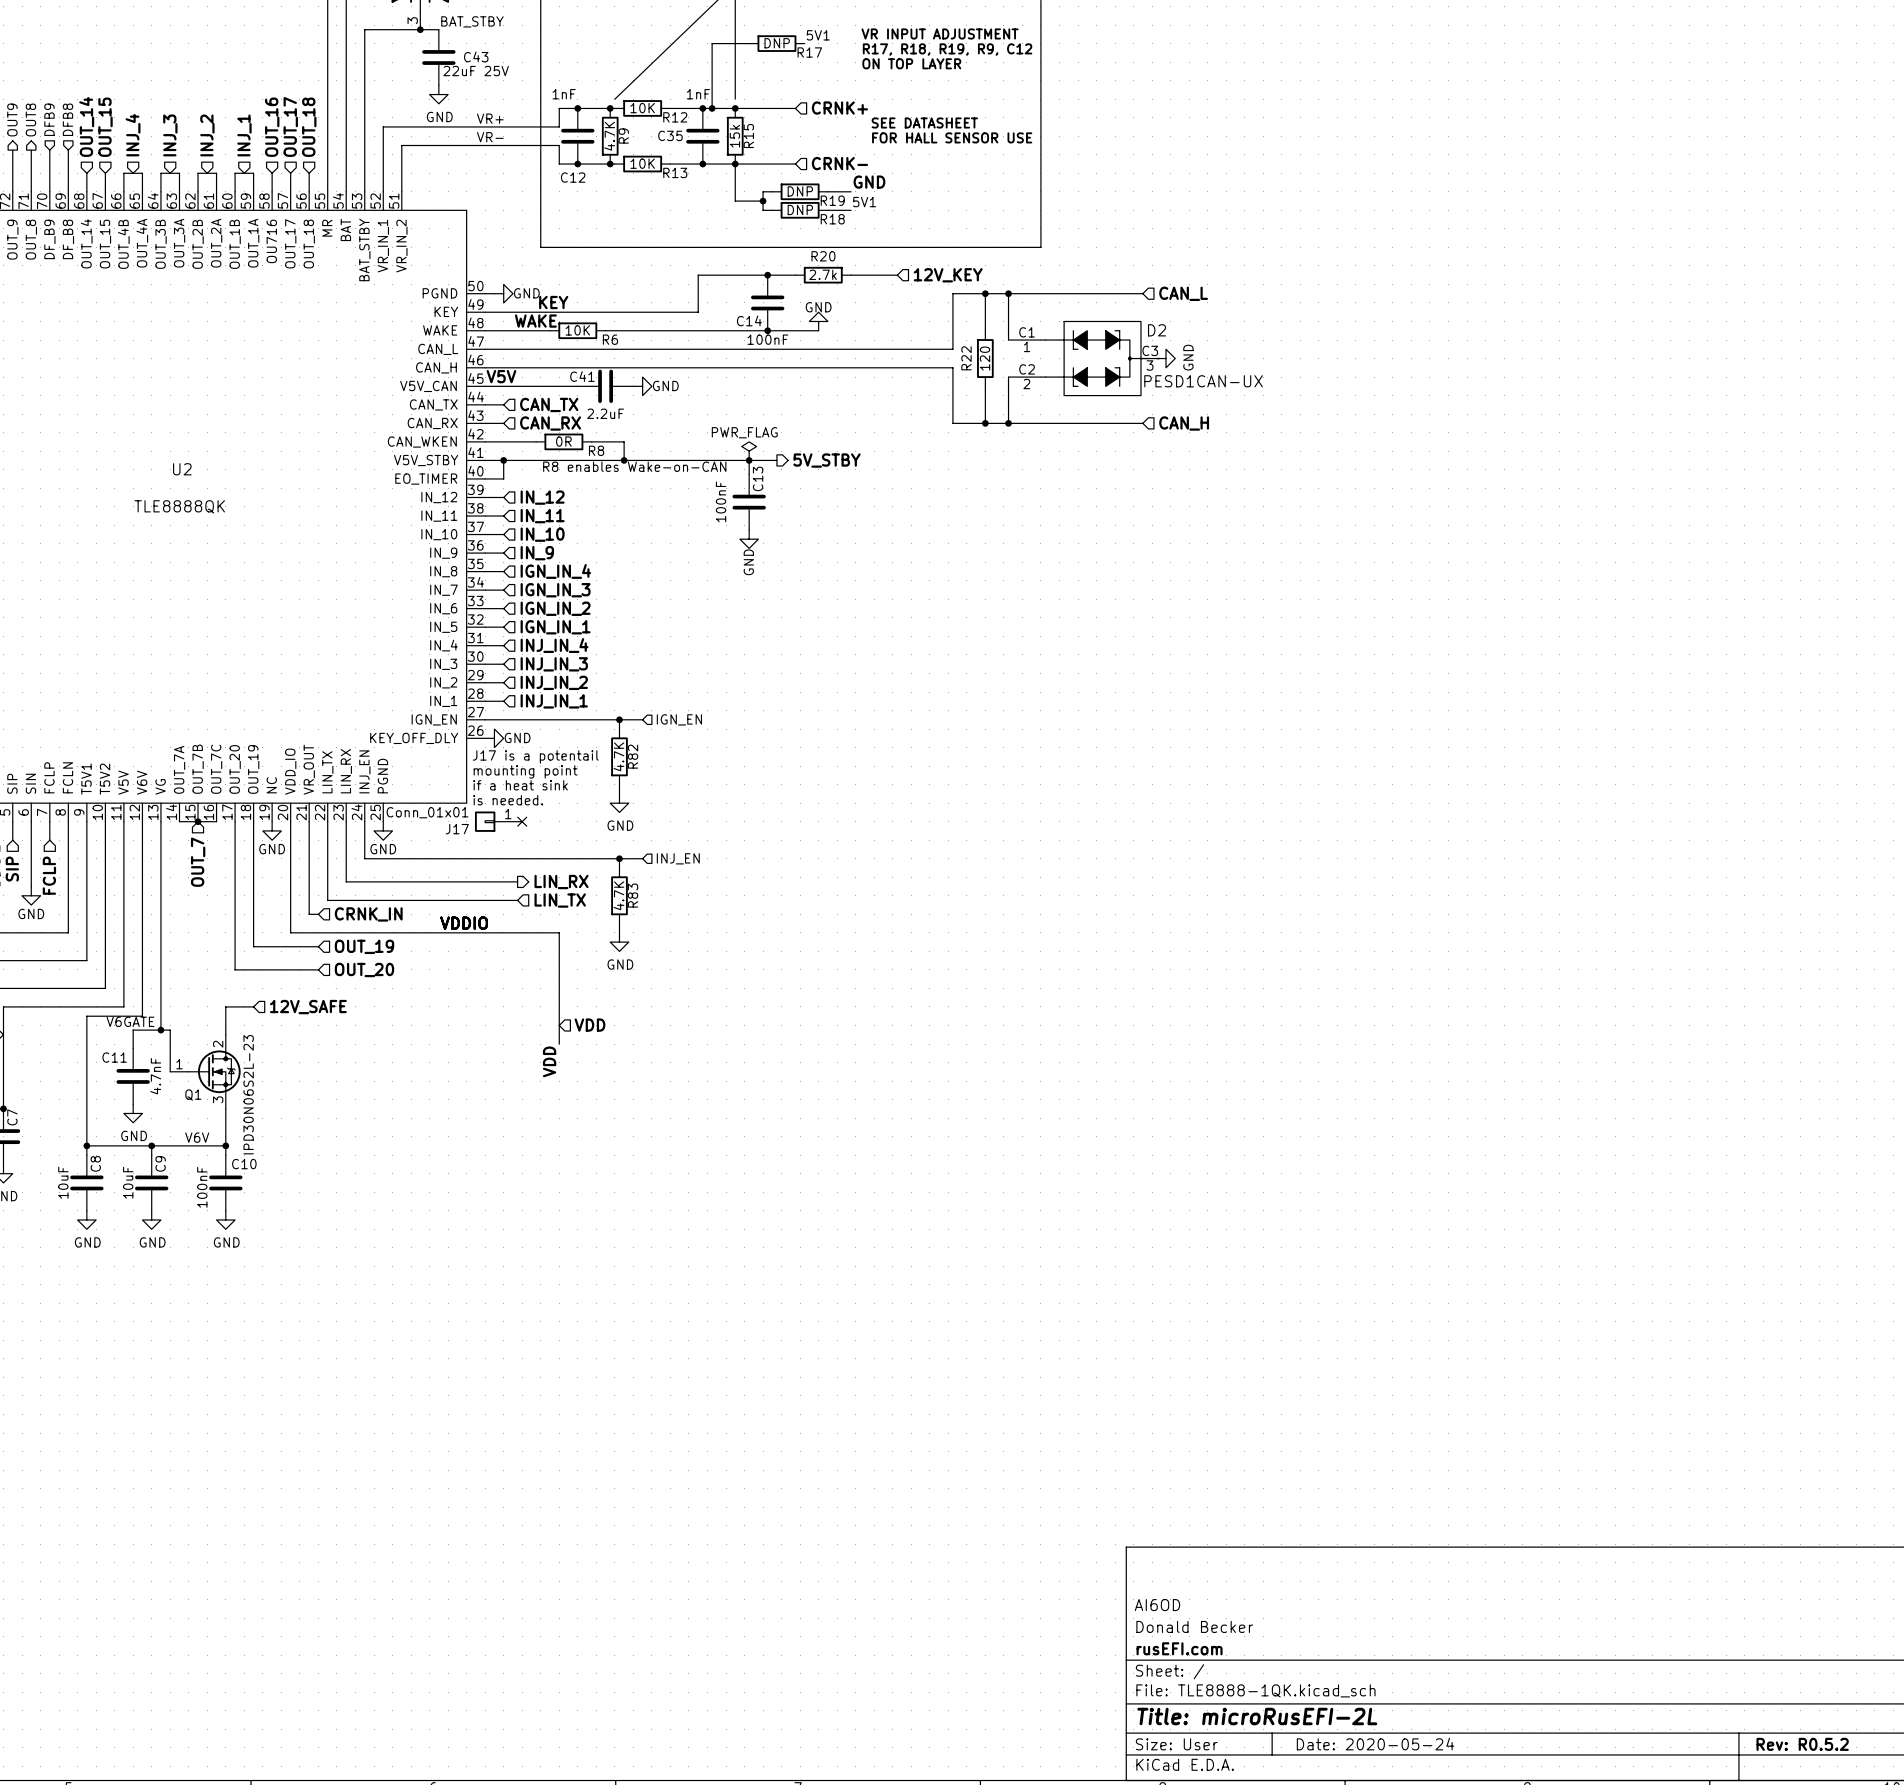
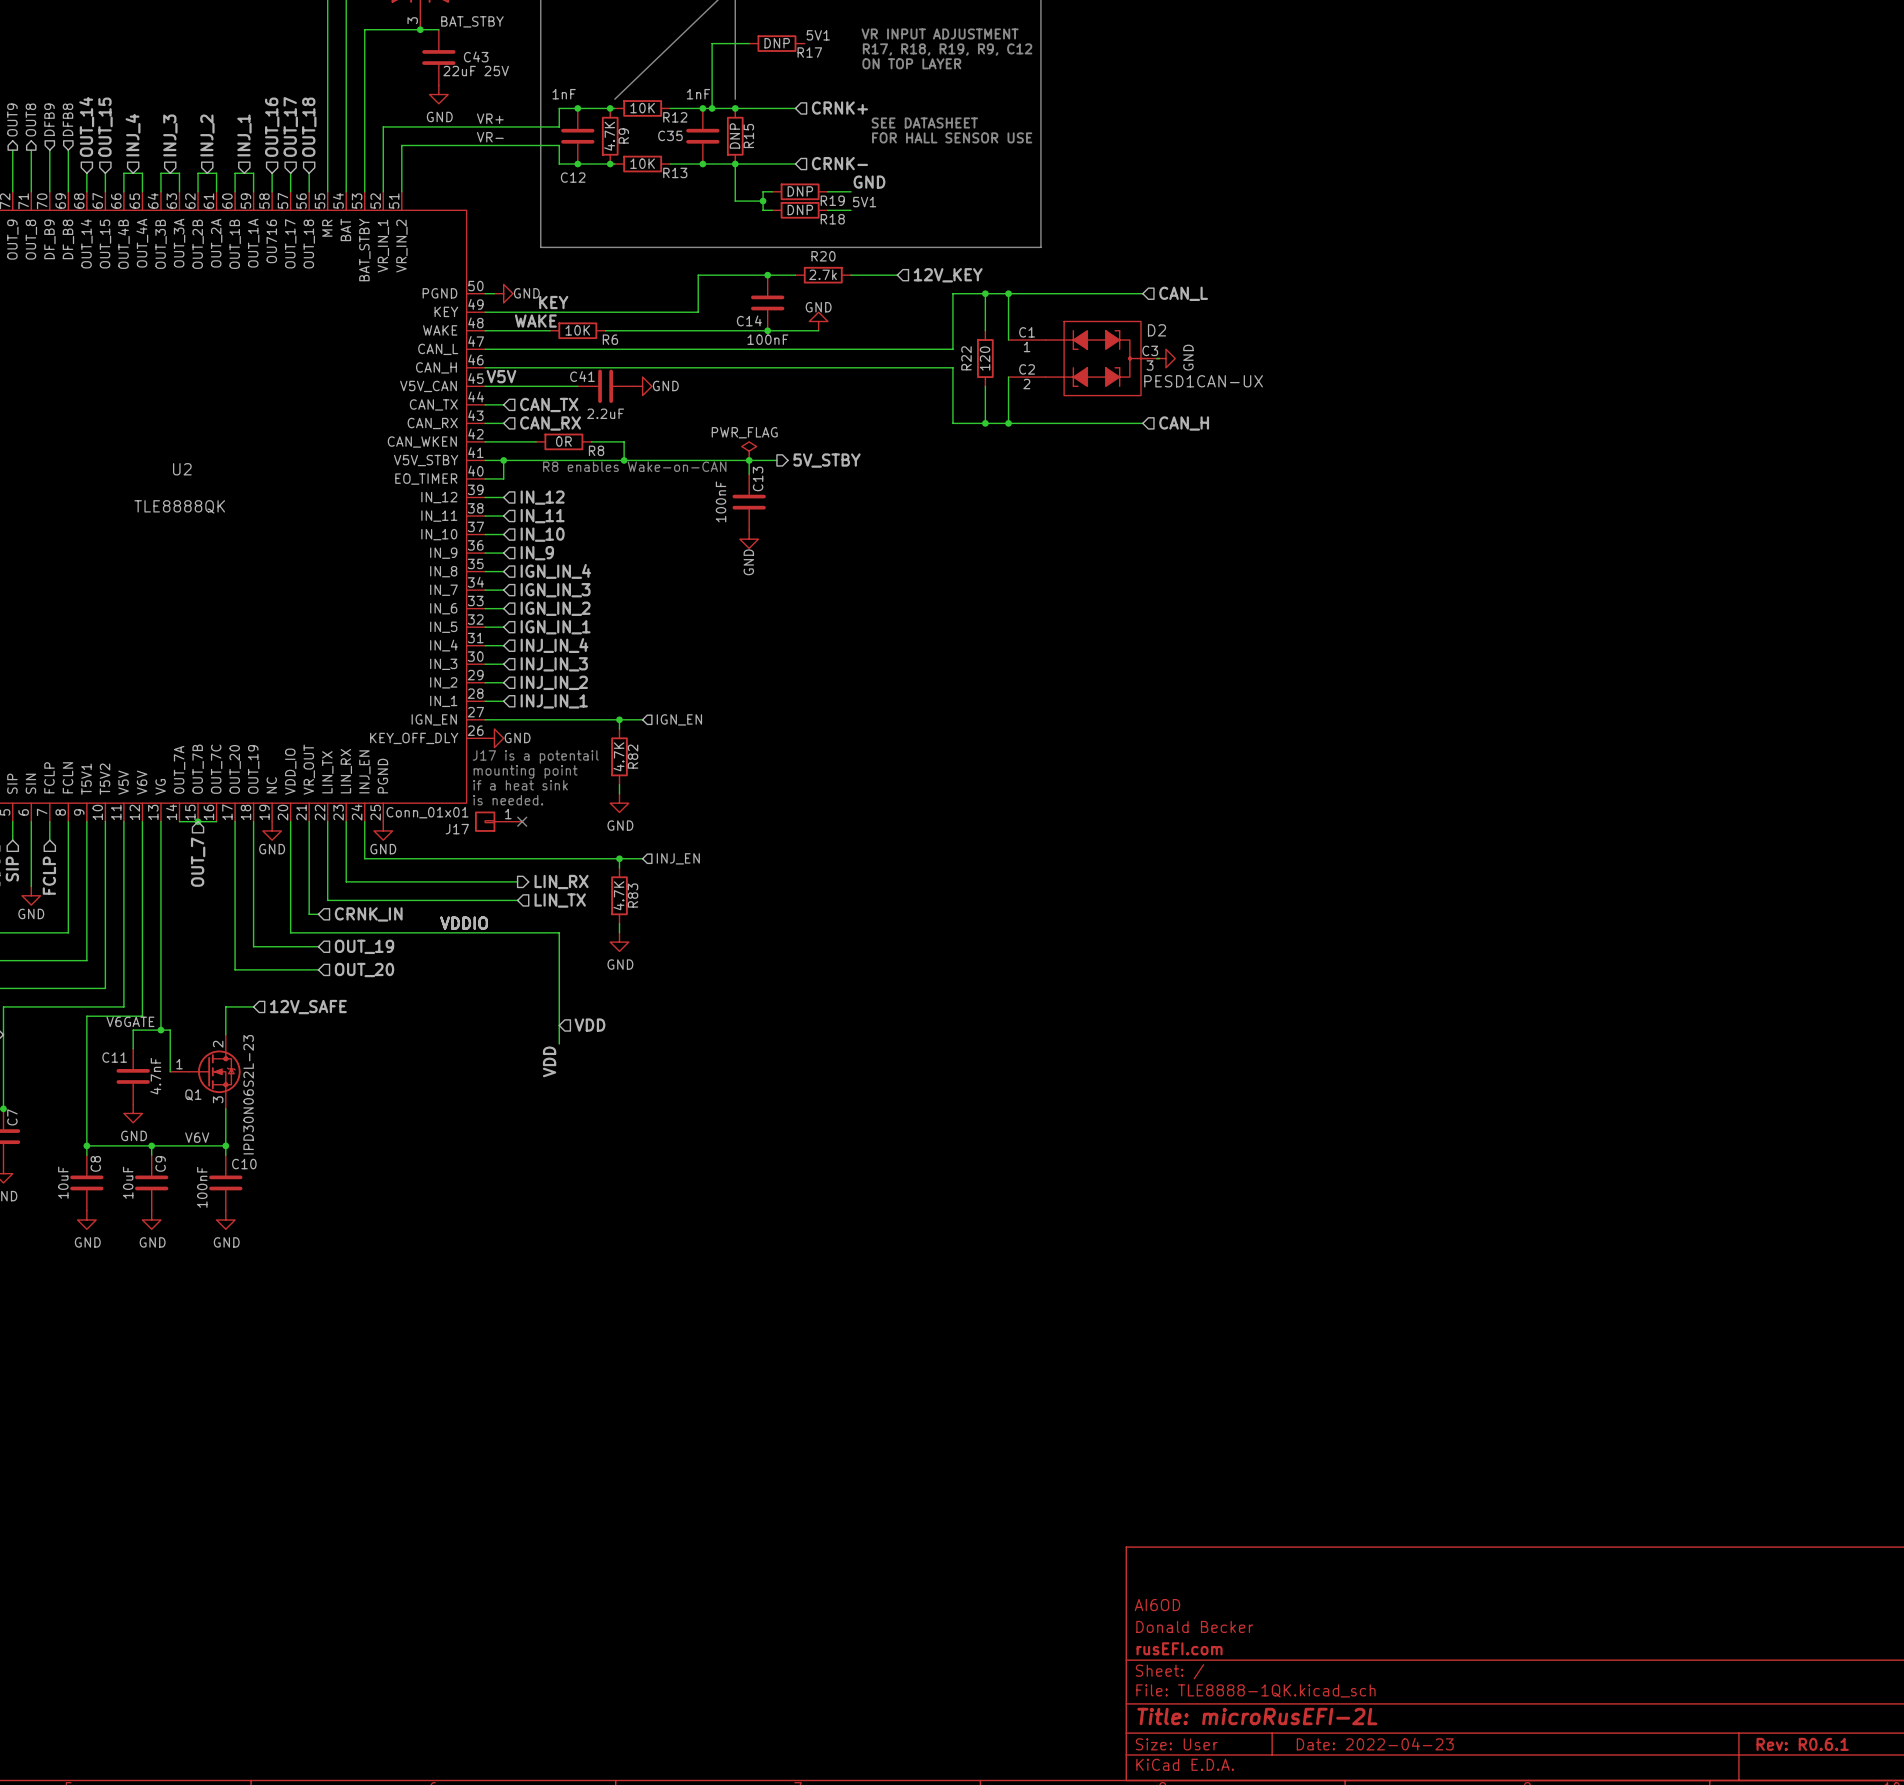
R15 value: 15k (734, 136) -> DNP (734, 136)
title block: Date: 2020-05-24 (1375, 1744) -> Date: 2022-04-23 (1375, 1744)
title block: Rev: R0.5.2 (1802, 1744) -> Rev: R0.6.1 (1802, 1744)

